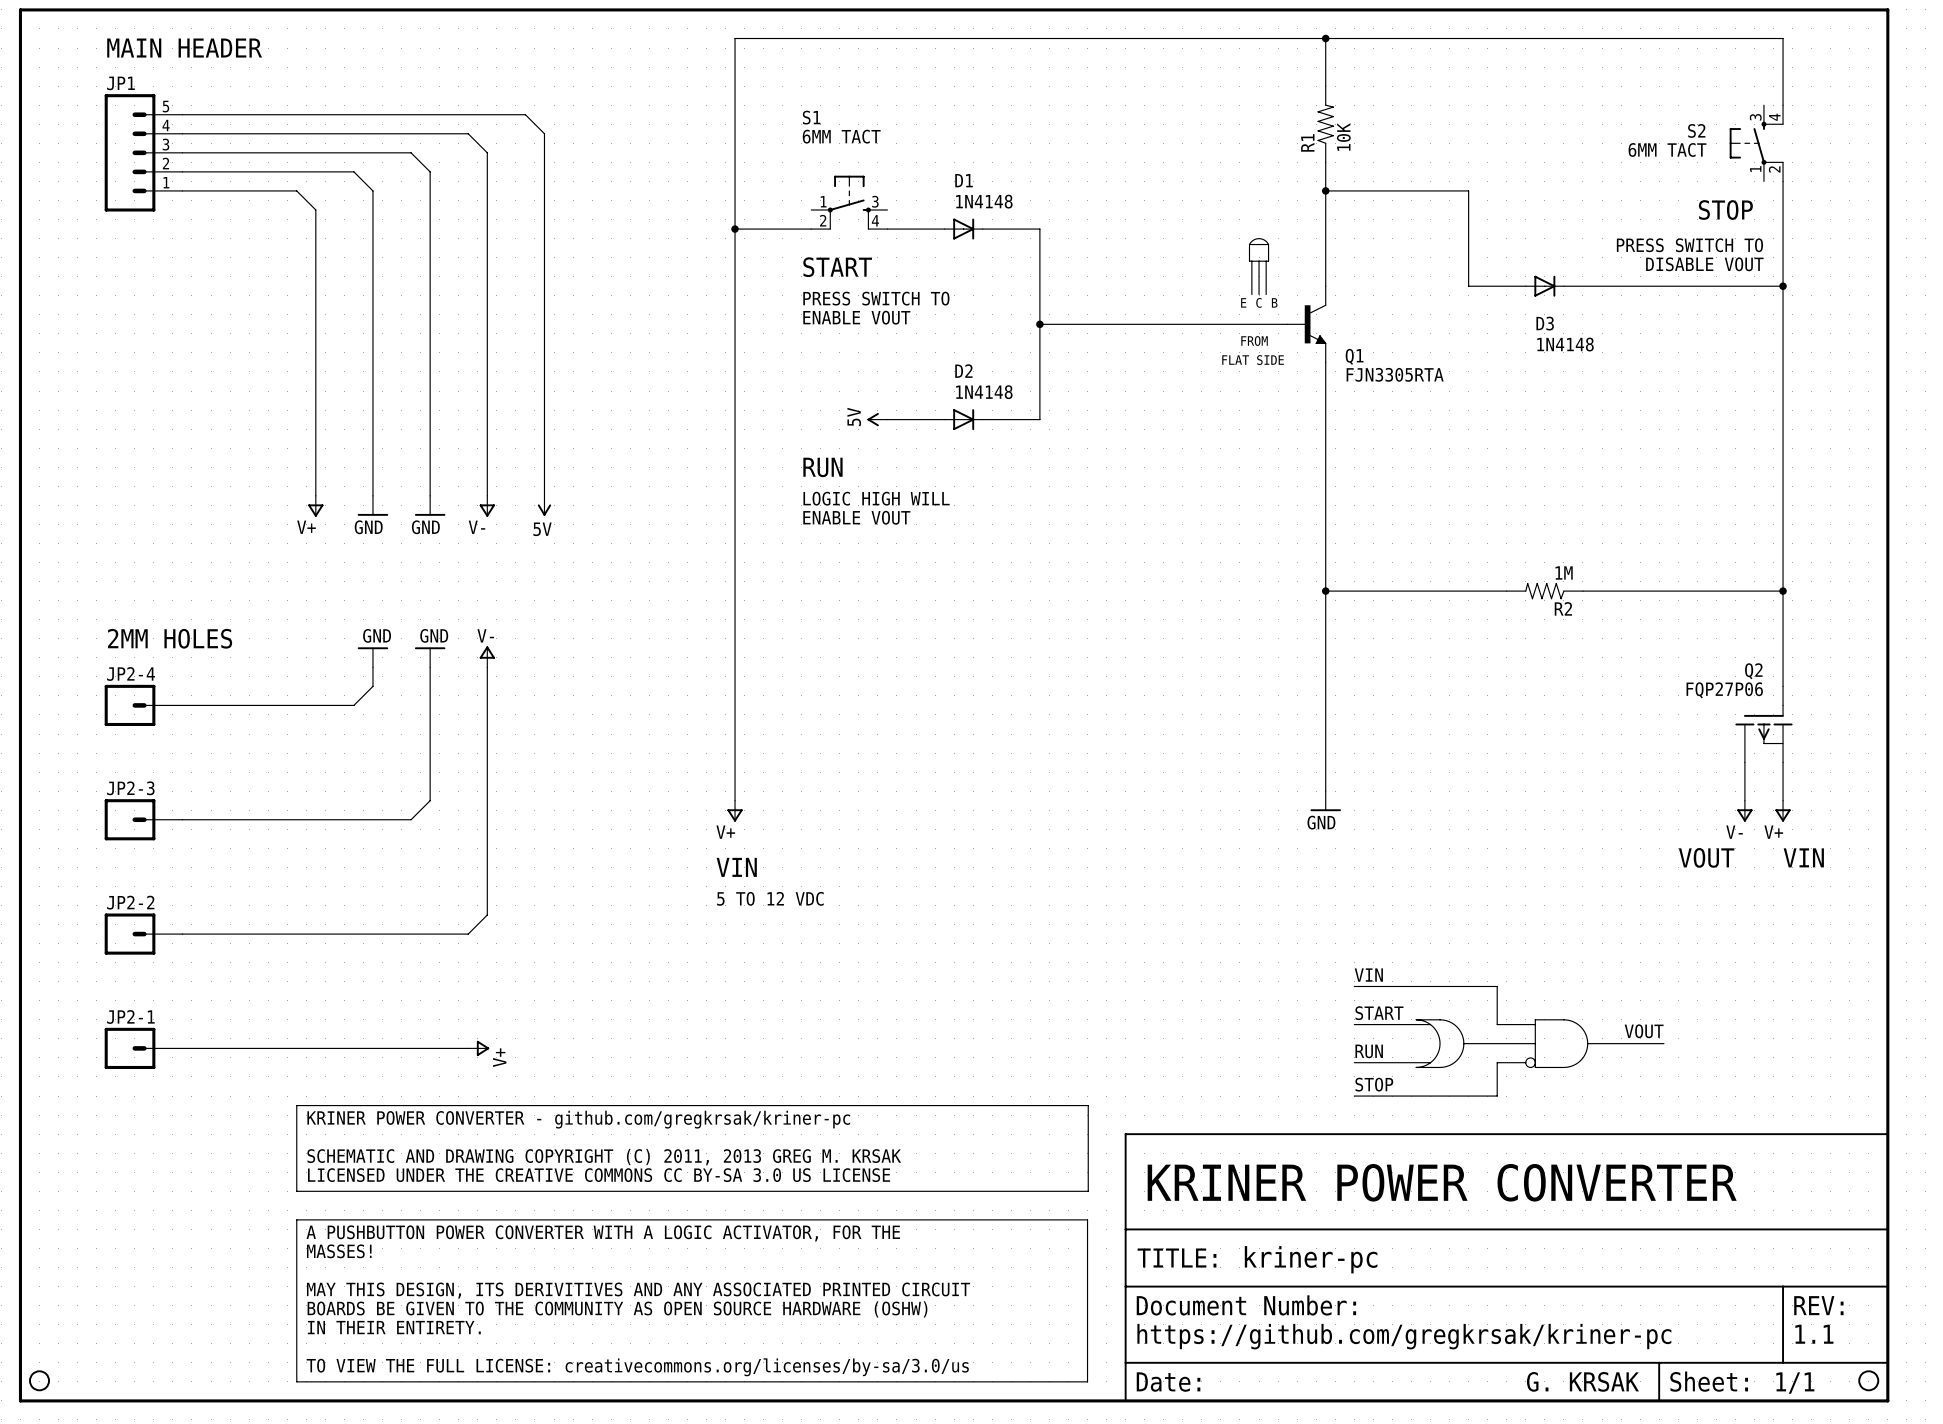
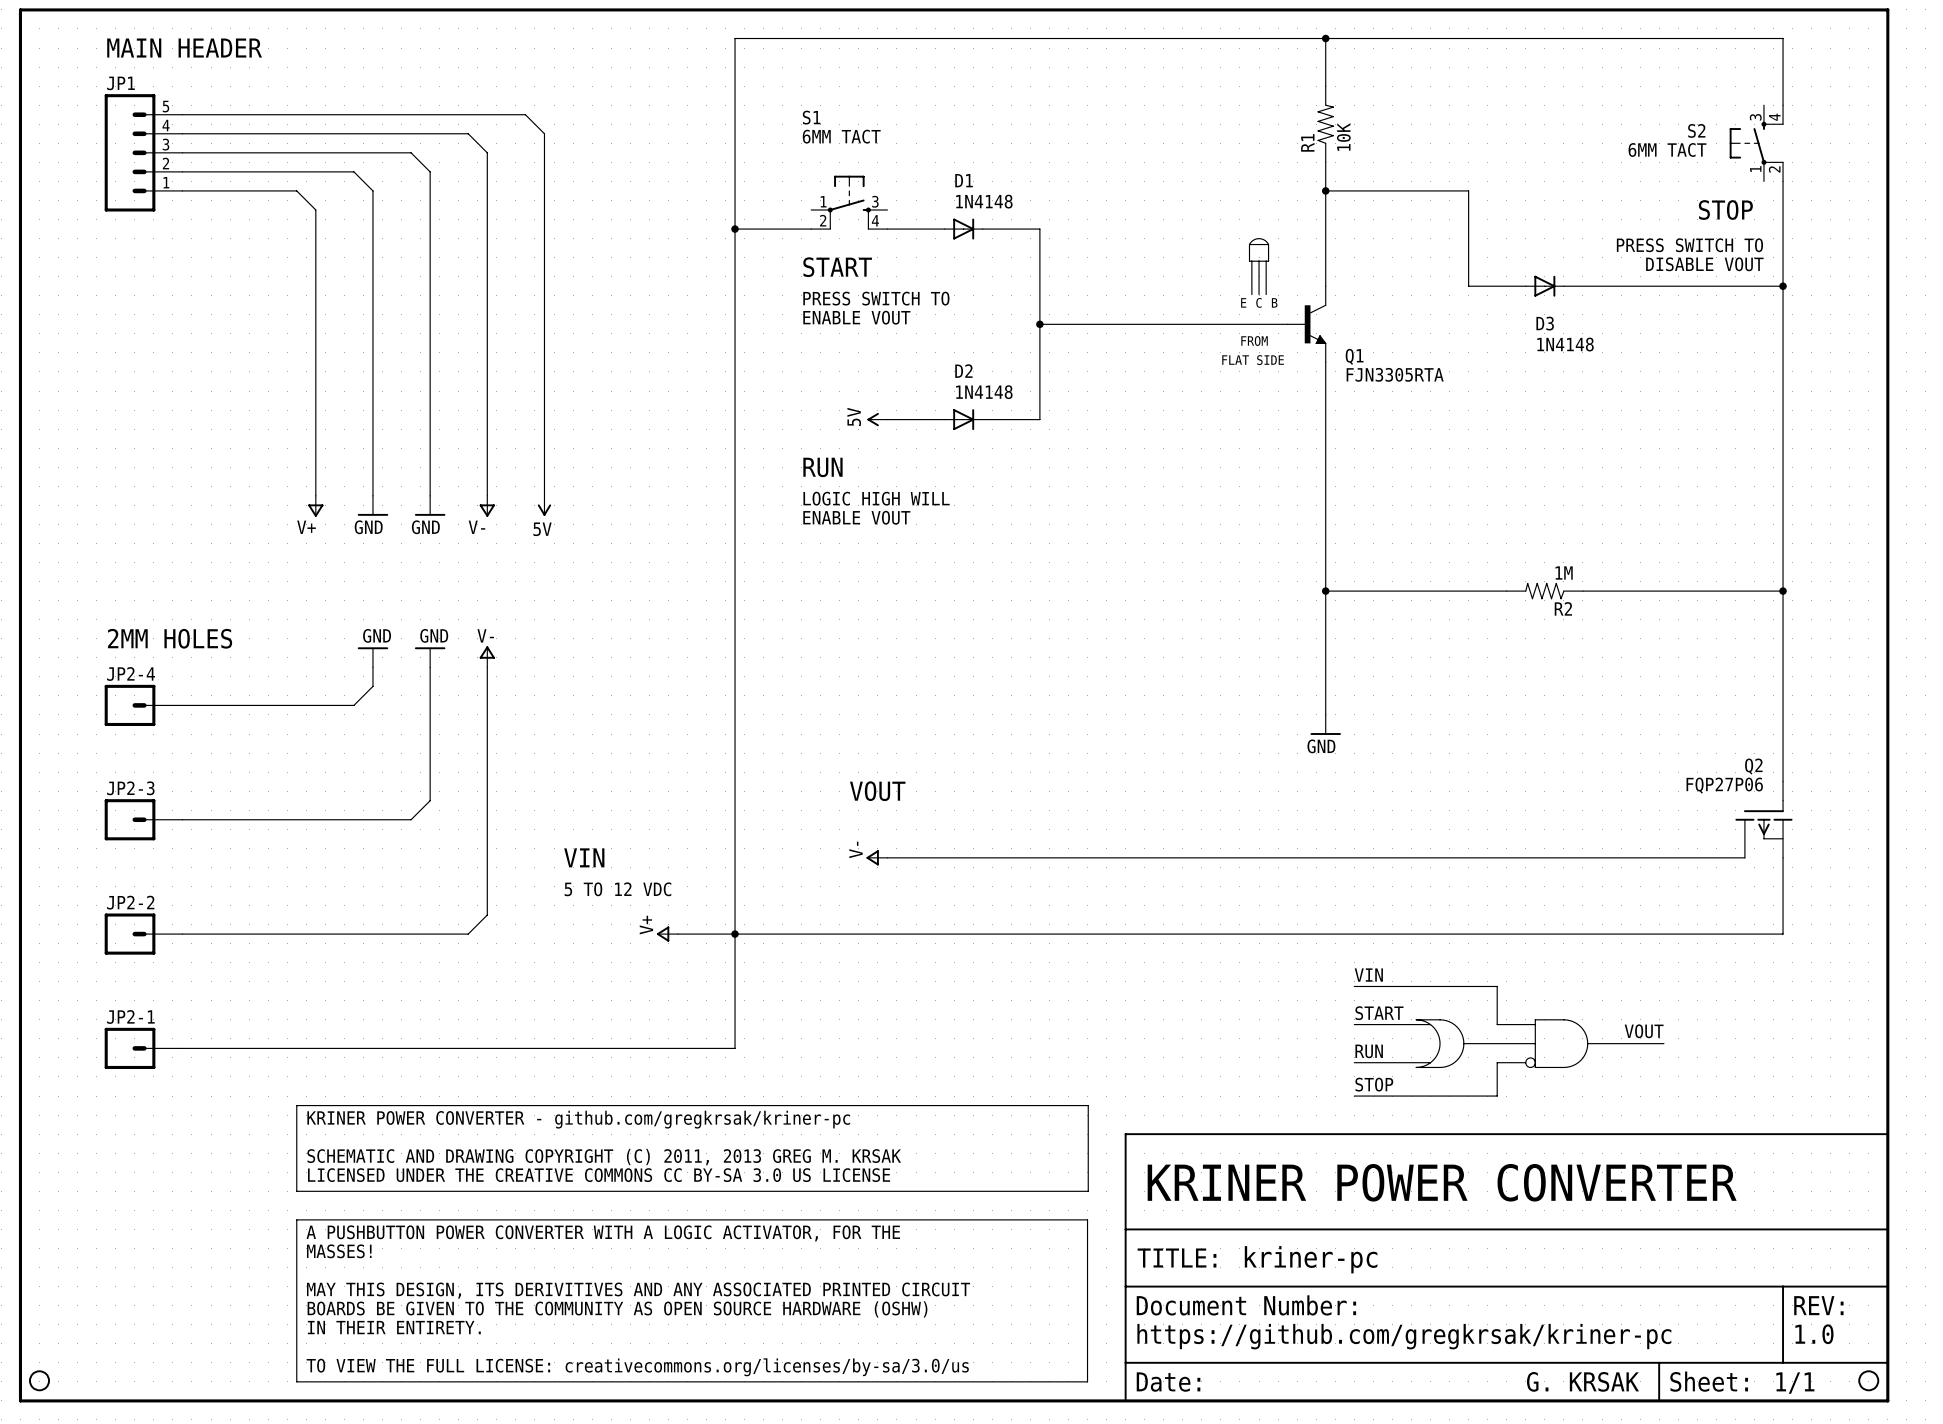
wire: (1325, 714) (1325, 791) -> none
Q2 position: (1763, 724) -> (1763, 819)
wire: (1744, 762) (1744, 800) -> none
text: none -> VOUT (877, 791)
wire: none -> (735, 800) (735, 1048) (468, 1048)
power symbol position: GND (1325, 801) -> GND (1325, 724)
power symbol: V+ (735, 811) -> none
power symbol: V- (1744, 811) -> none
power symbol: V+ (1783, 811) -> none
power symbol: none -> V- (876, 857)
wire: none -> (887, 857) (1744, 857)
text: VOUT (1706, 857) -> none
wire: none -> (1783, 857) (1783, 934) (677, 934)
text: VIN (1803, 857) -> none
text position: VIN (736, 867) -> VIN (584, 857)
text position: 5 TO 12 VDC (770, 898) -> 5 TO 12 VDC (617, 889)
power symbol: none -> V+ (667, 934)
junction: none -> (735, 934)
power symbol: V+ (478, 1048) -> none
text: 1.1 (1814, 1334) -> 1.0 (1814, 1334)

